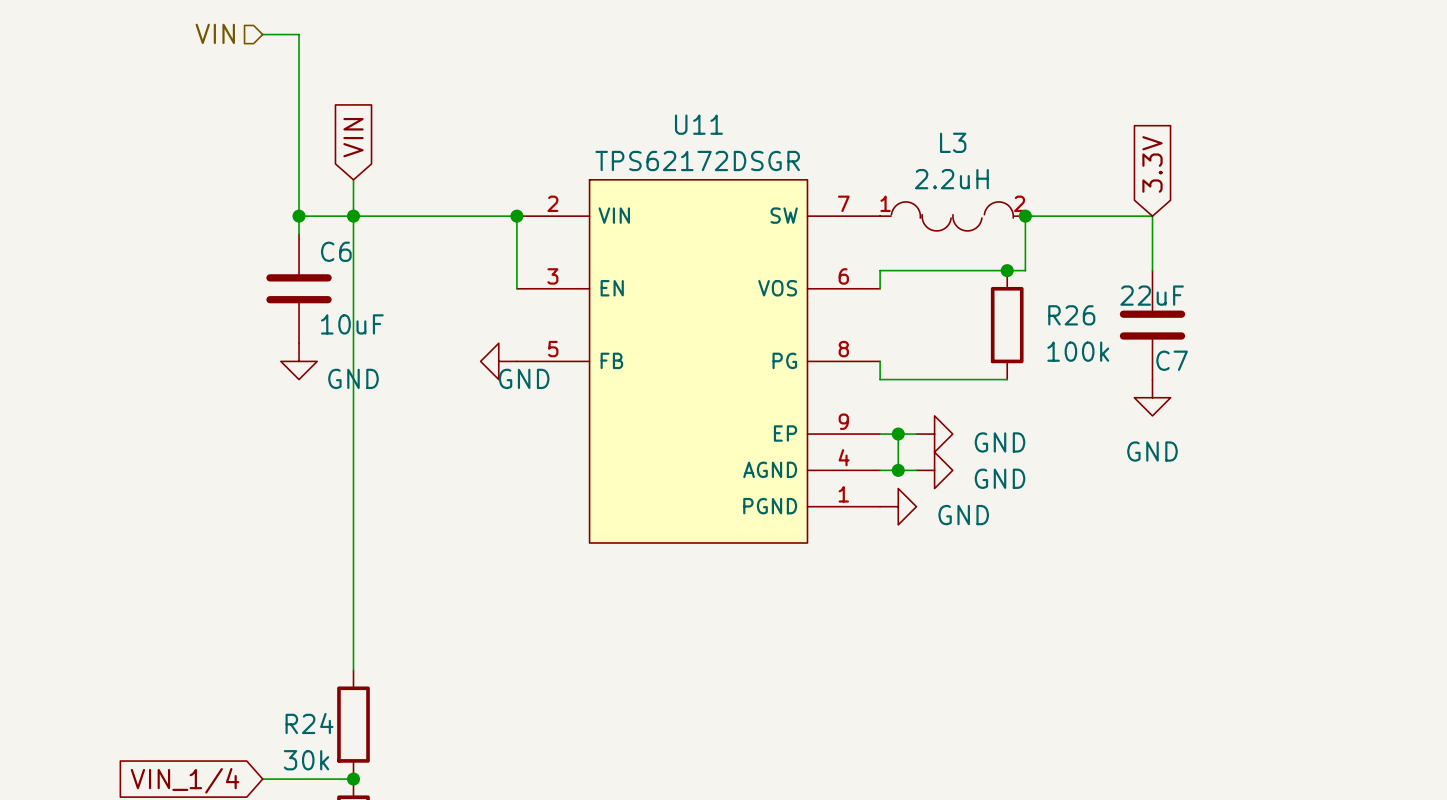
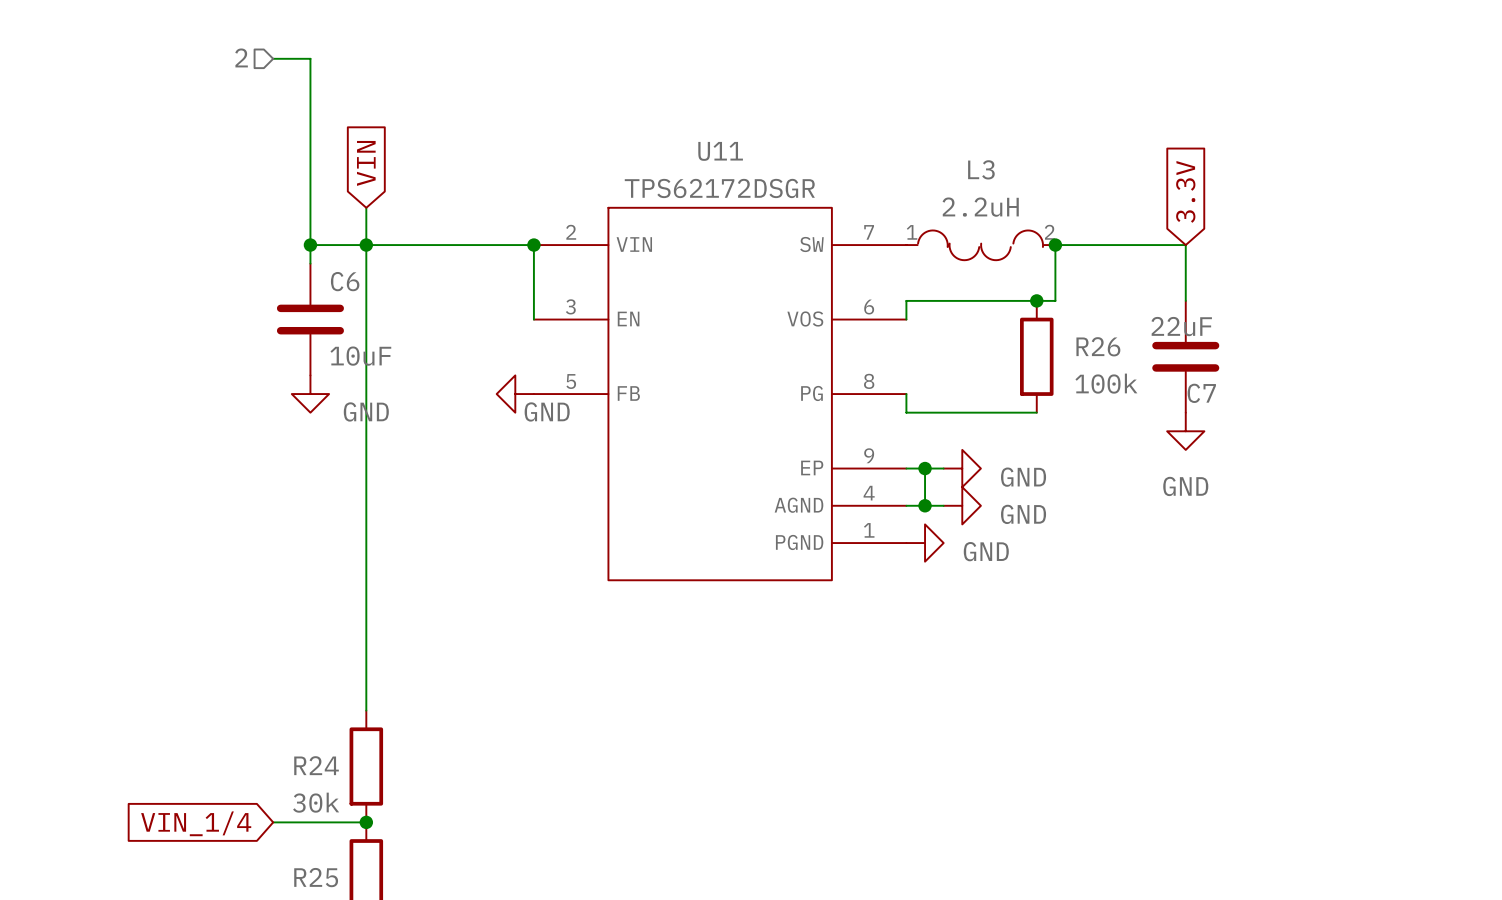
hierarchical label: VIN (215, 33) -> 2 (241, 57)

